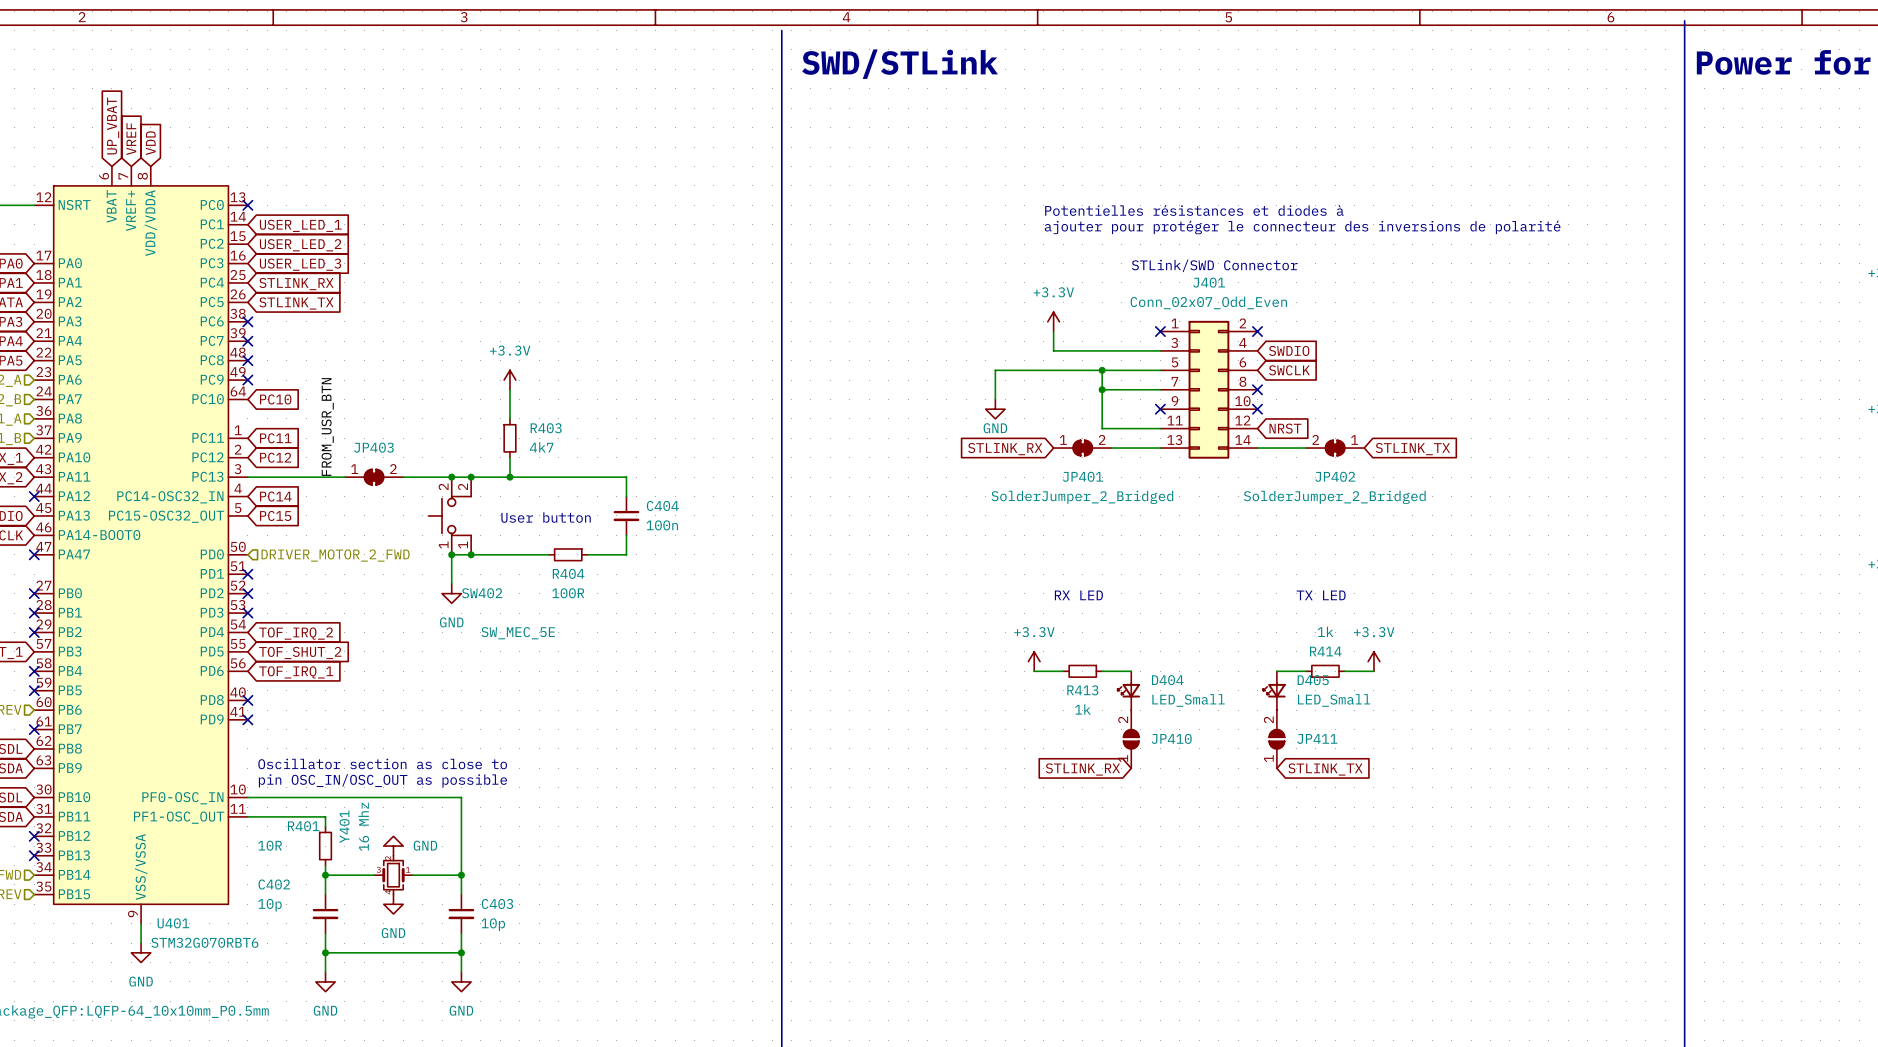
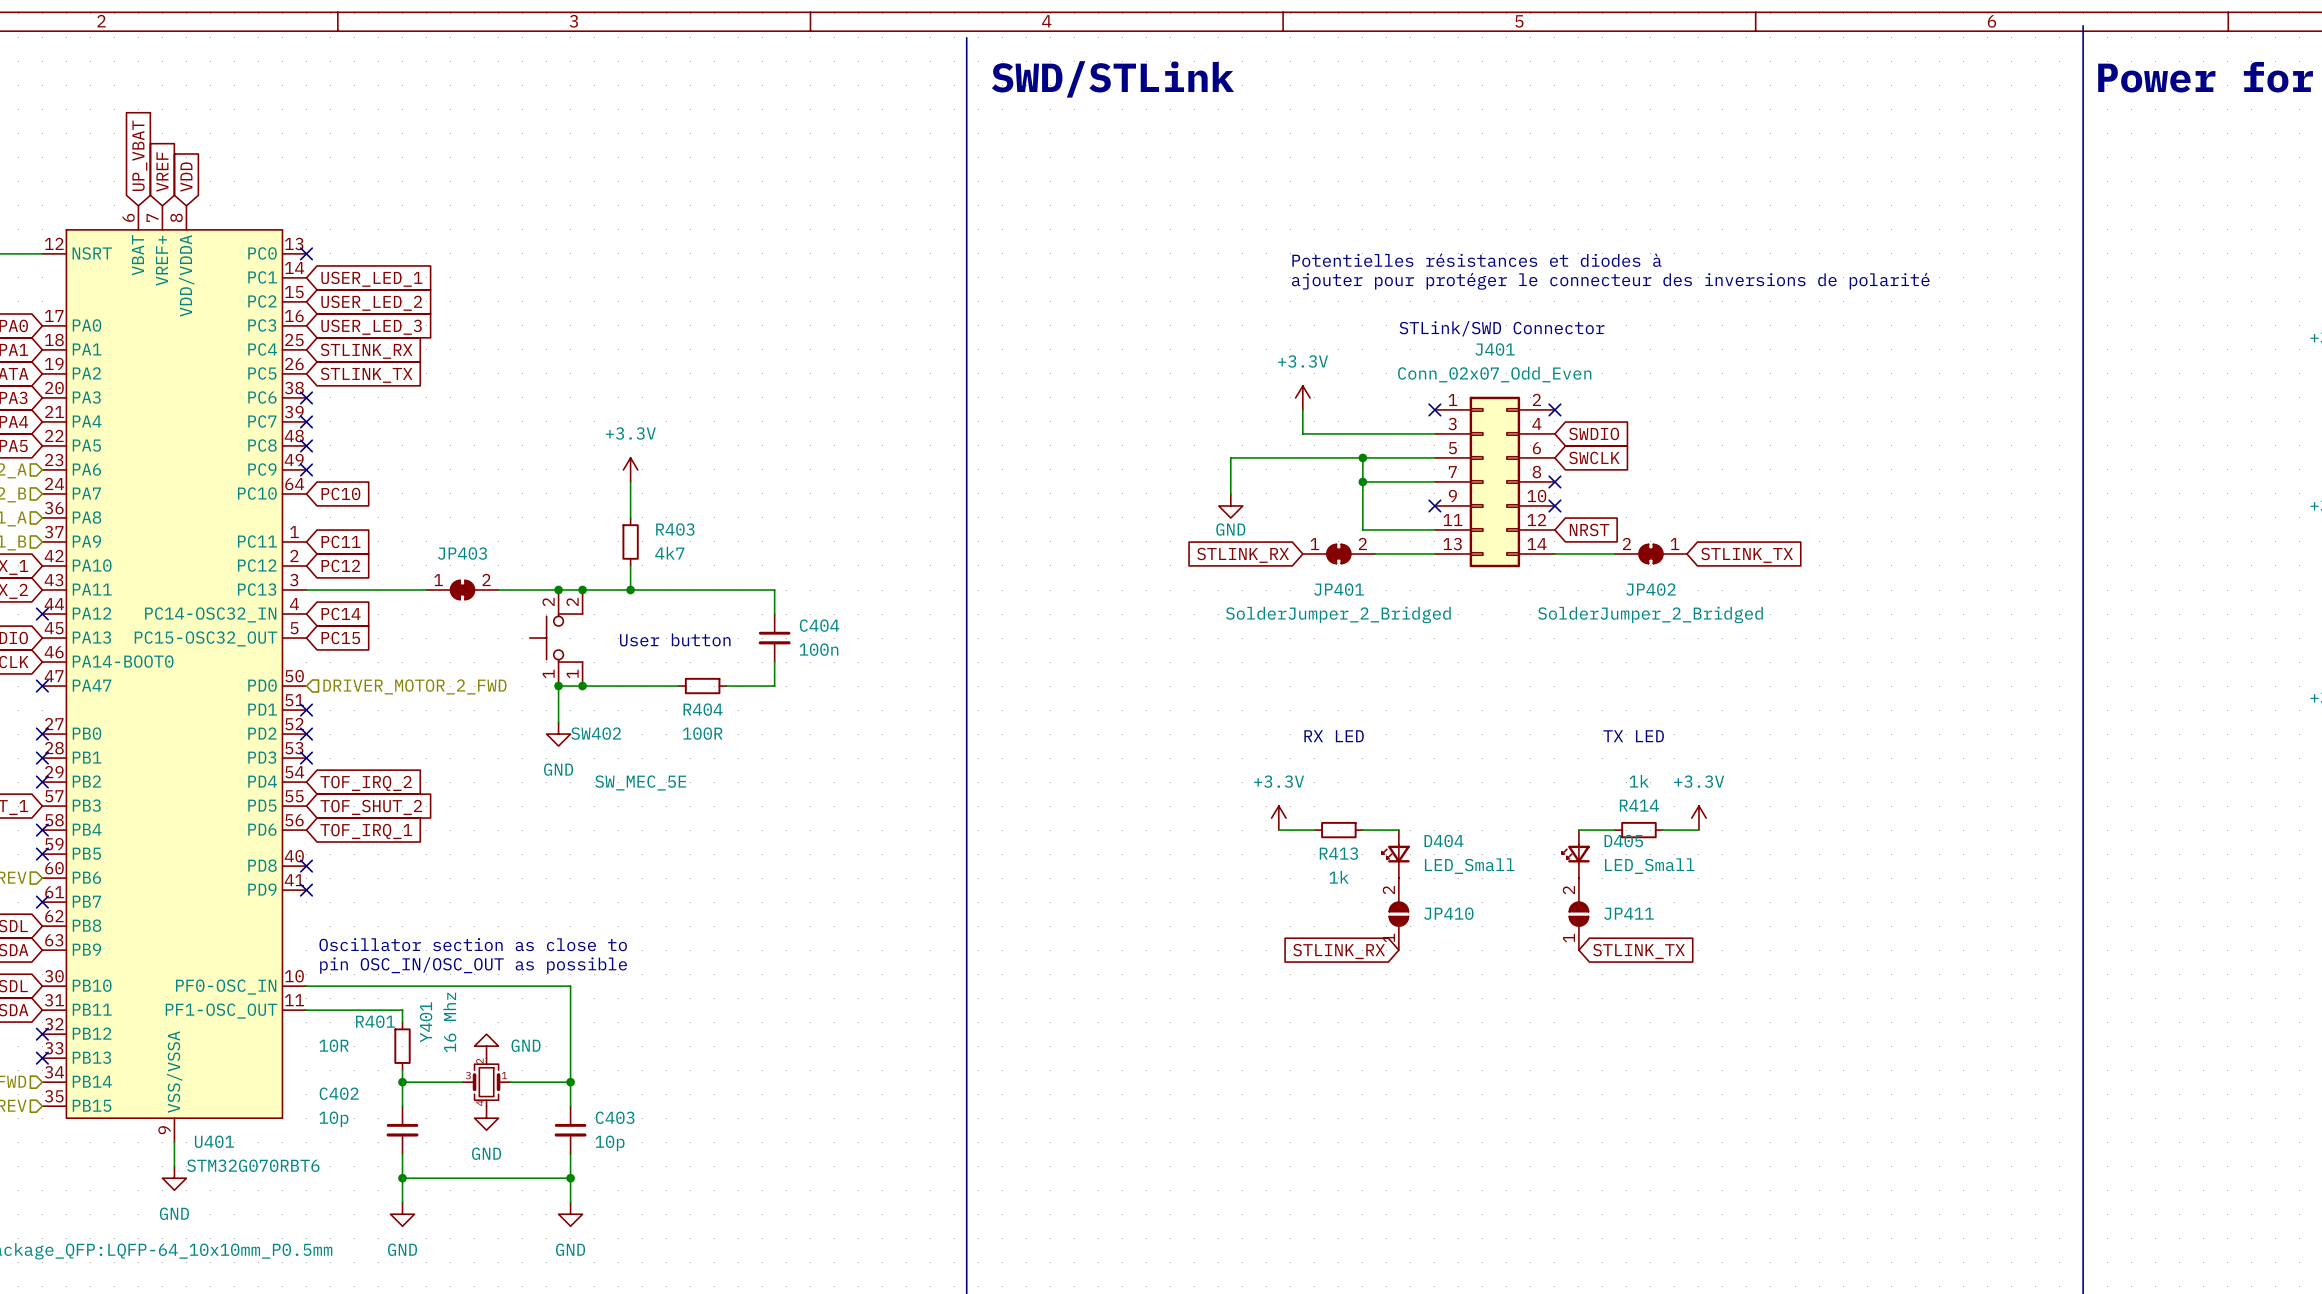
label: FROM_USR_BTN (327, 427) -> none

